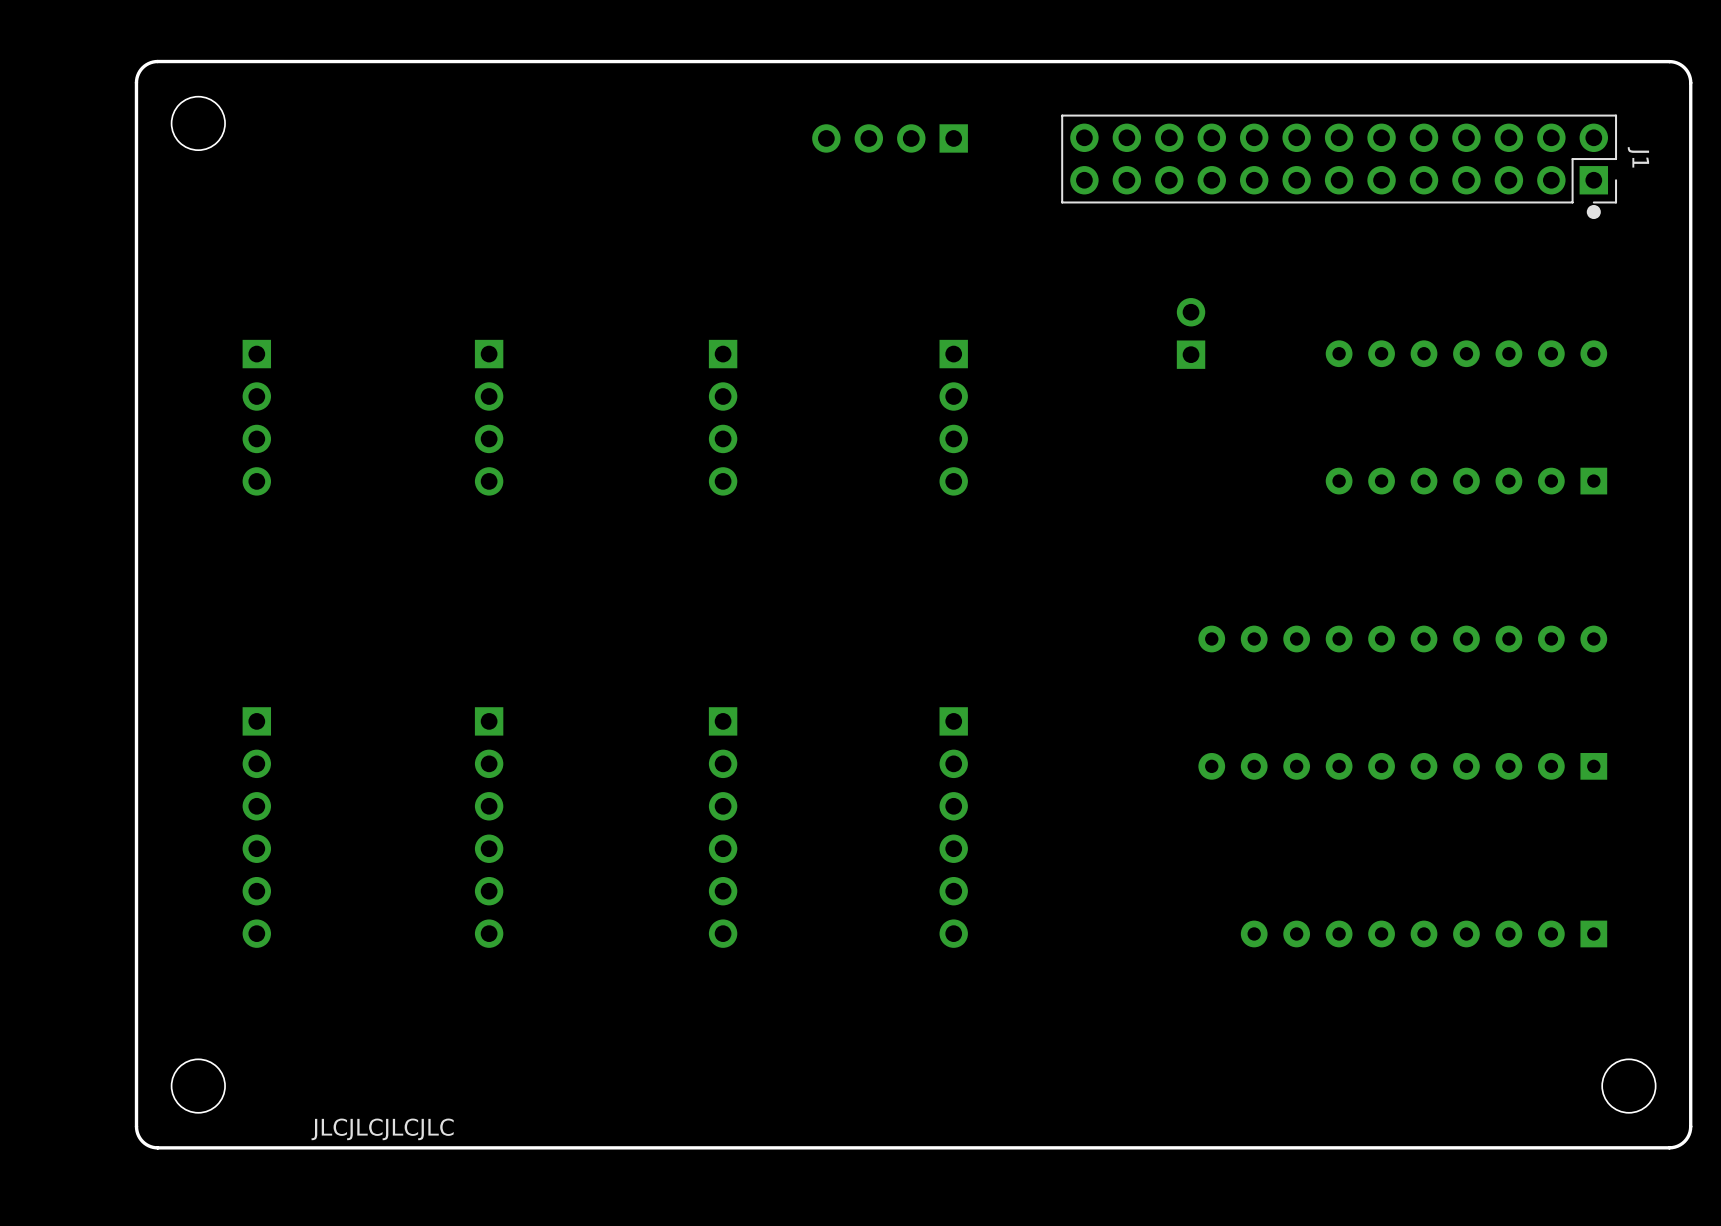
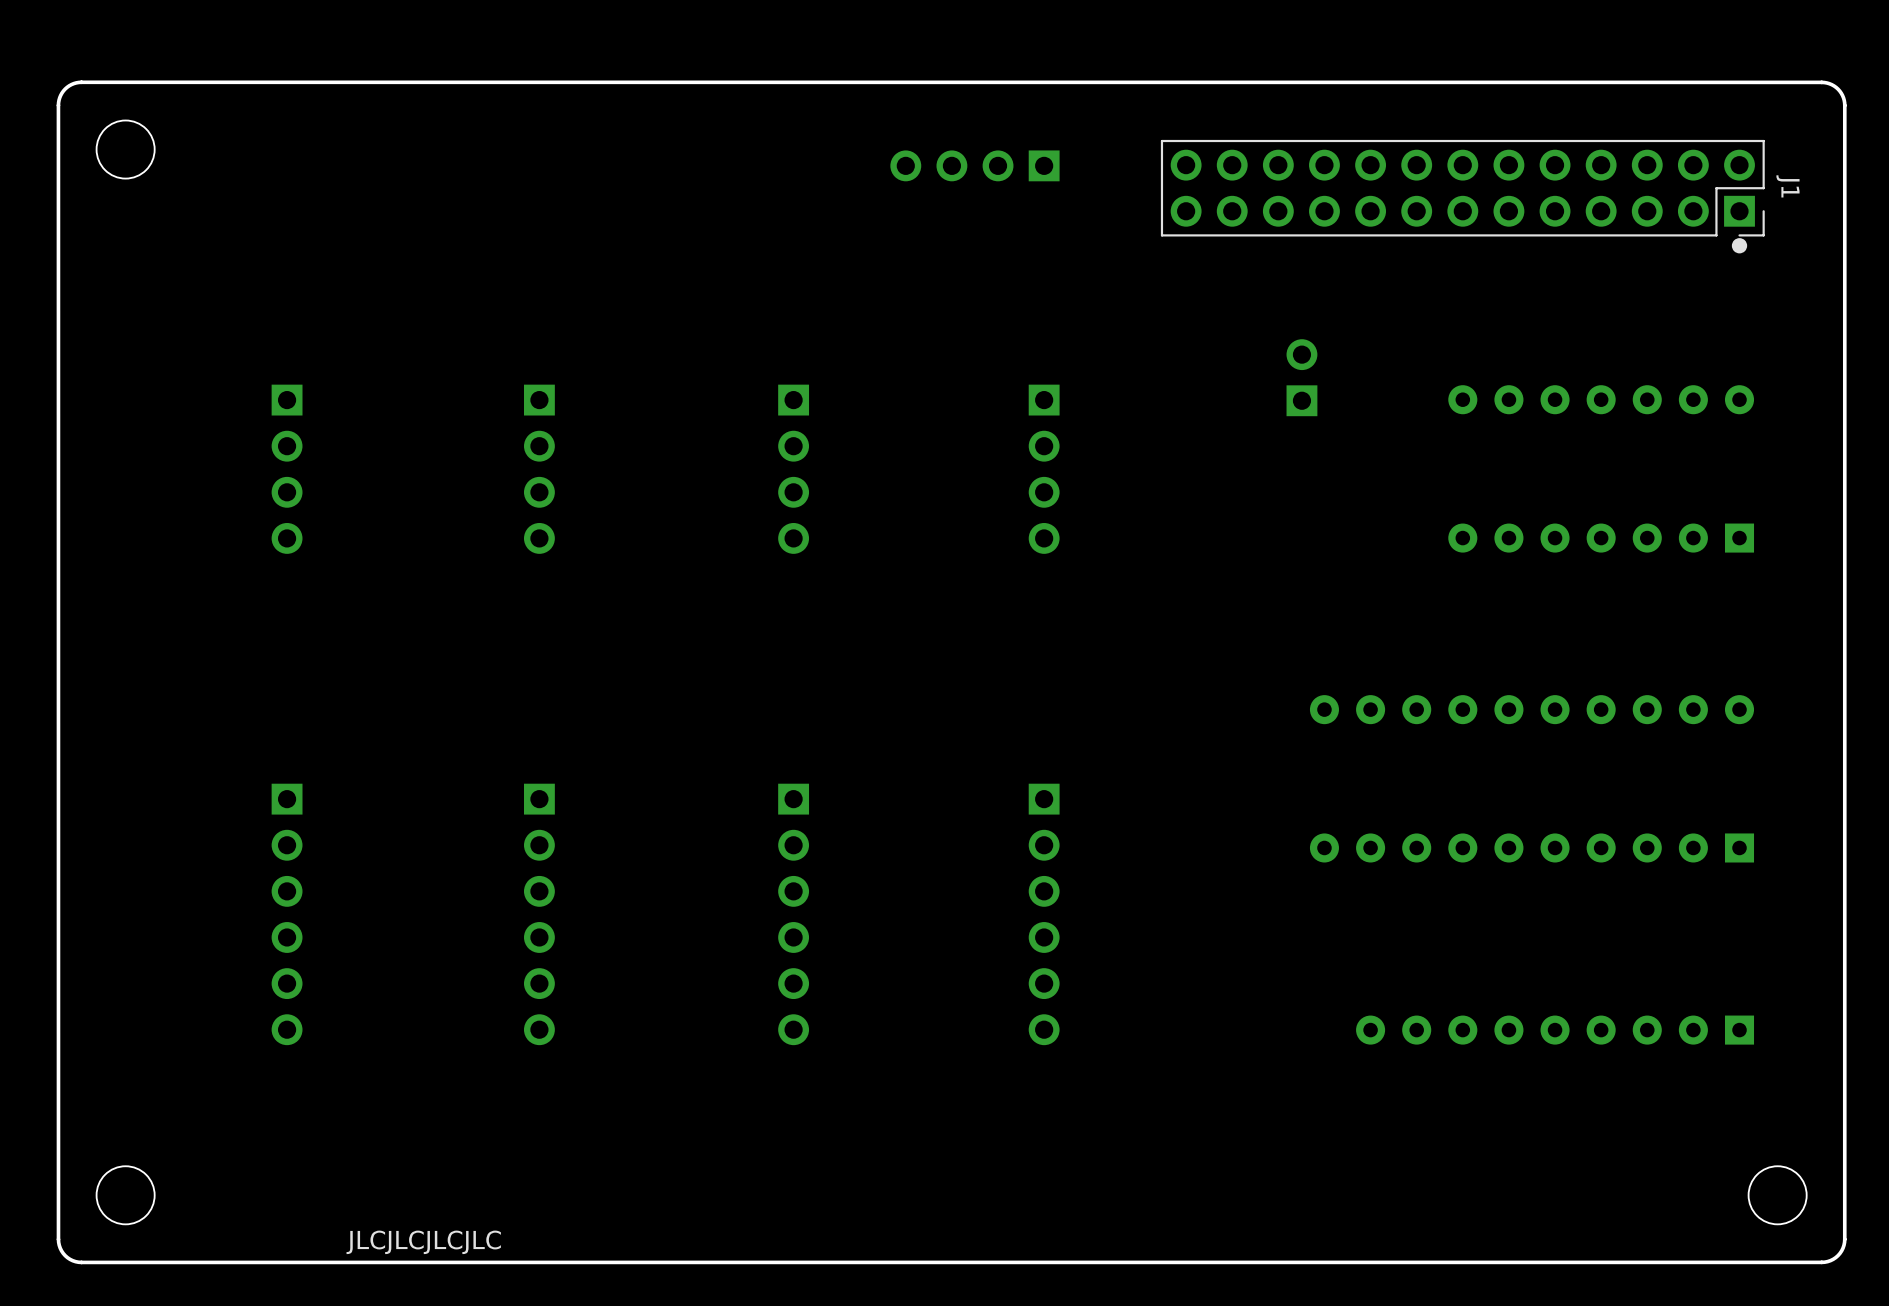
board edge: (157, 61) (148, 63) (142, 67) (138, 73) (136, 82) (136, 1126) (138, 1135) (142, 1141) (148, 1145) (157, 1147) -> (179, 82) (76, 82) (63, 90) (58, 105) (58, 1242) (65, 1255) (78, 1262) (179, 1262)
round board edge position: (198, 123) -> (125, 149)
round board edge position: (198, 1086) -> (125, 1195)

